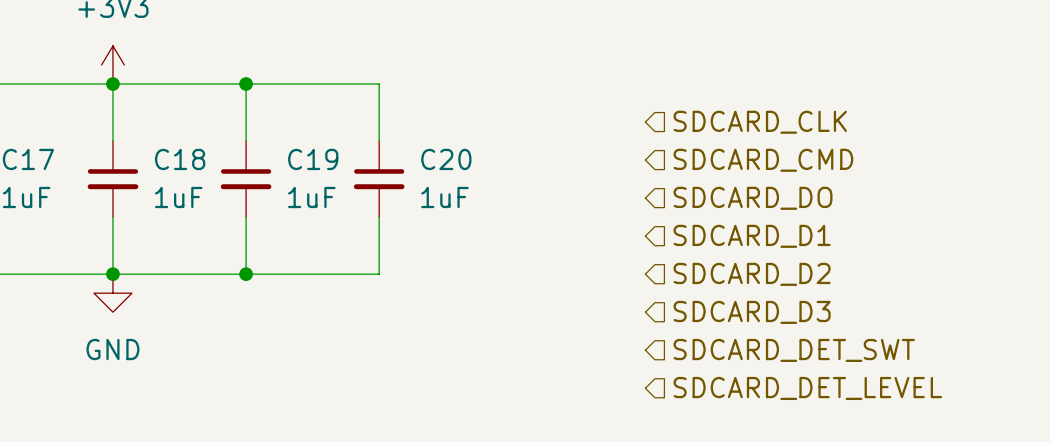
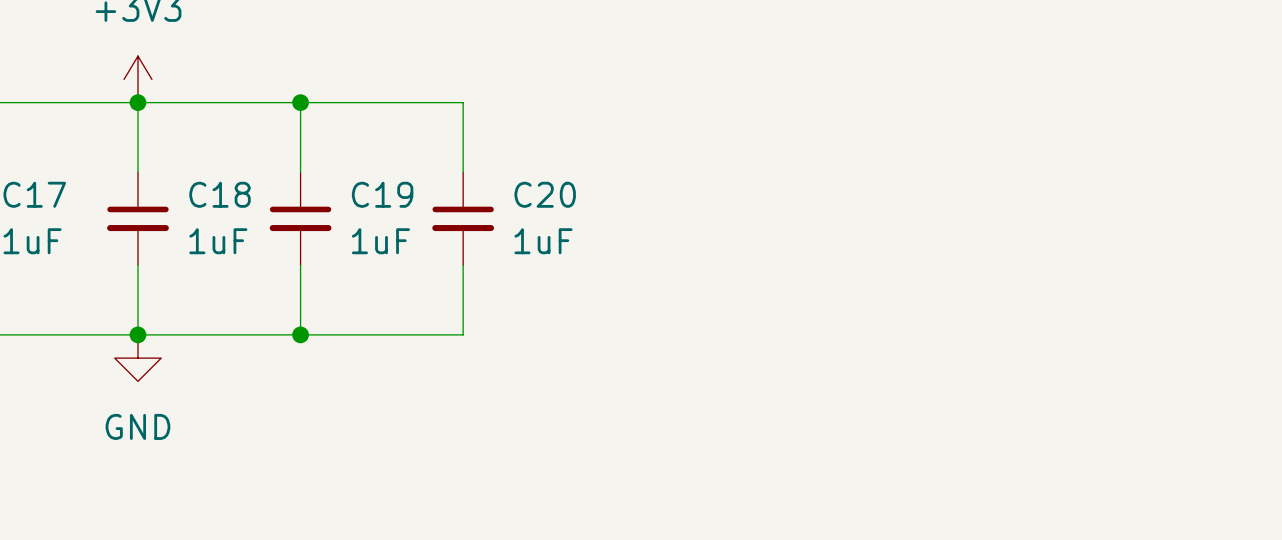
hierarchical label: SDCARD_CLK (760, 122) -> none
hierarchical label: SDCARD_CMD (763, 160) -> none
hierarchical label: SDCARD_DO (753, 198) -> none
hierarchical label: SDCARD_D1 (752, 236) -> none
hierarchical label: SDCARD_D2 (752, 274) -> none
hierarchical label: SDCARD_D3 (752, 312) -> none
hierarchical label: SDCARD_DET_SWT (794, 350) -> none
hierarchical label: SDCARD_DET_LEVEL (807, 388) -> none

